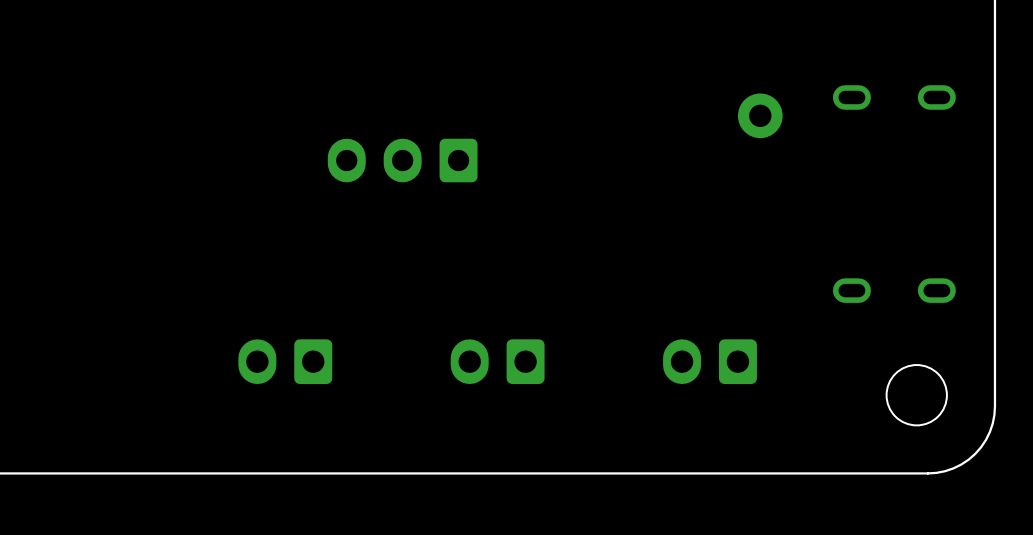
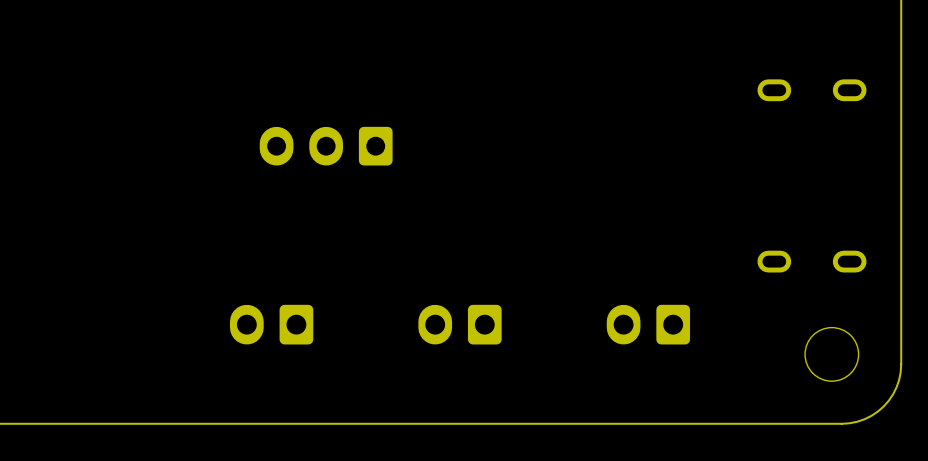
part: (760, 115) -> none
part position: (402, 160) -> (326, 146)

